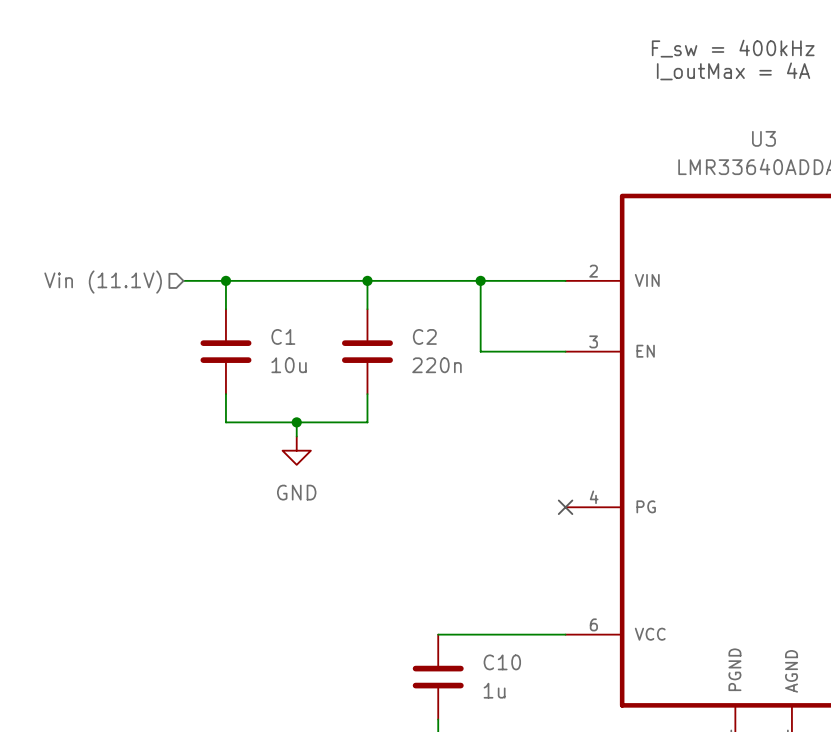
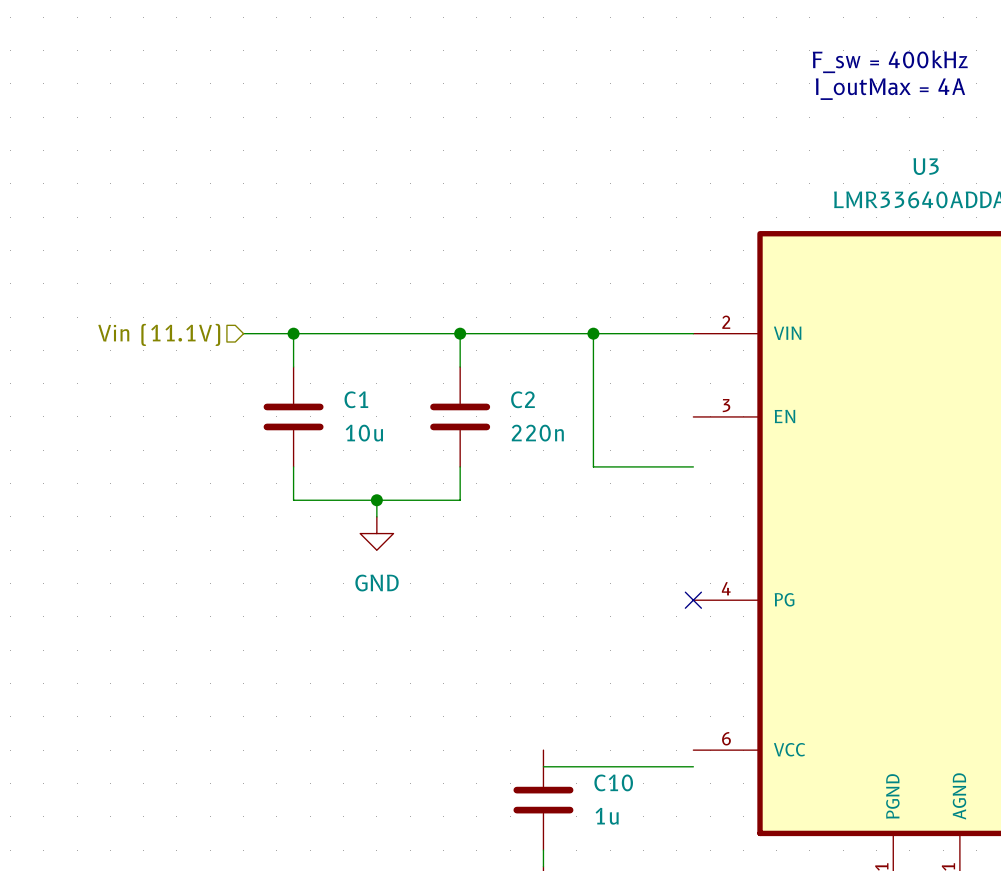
wire: (480, 351) (565, 351) -> (593, 416) (593, 466) (693, 466)
wire: (438, 634) (565, 634) -> (543, 766) (693, 766)

